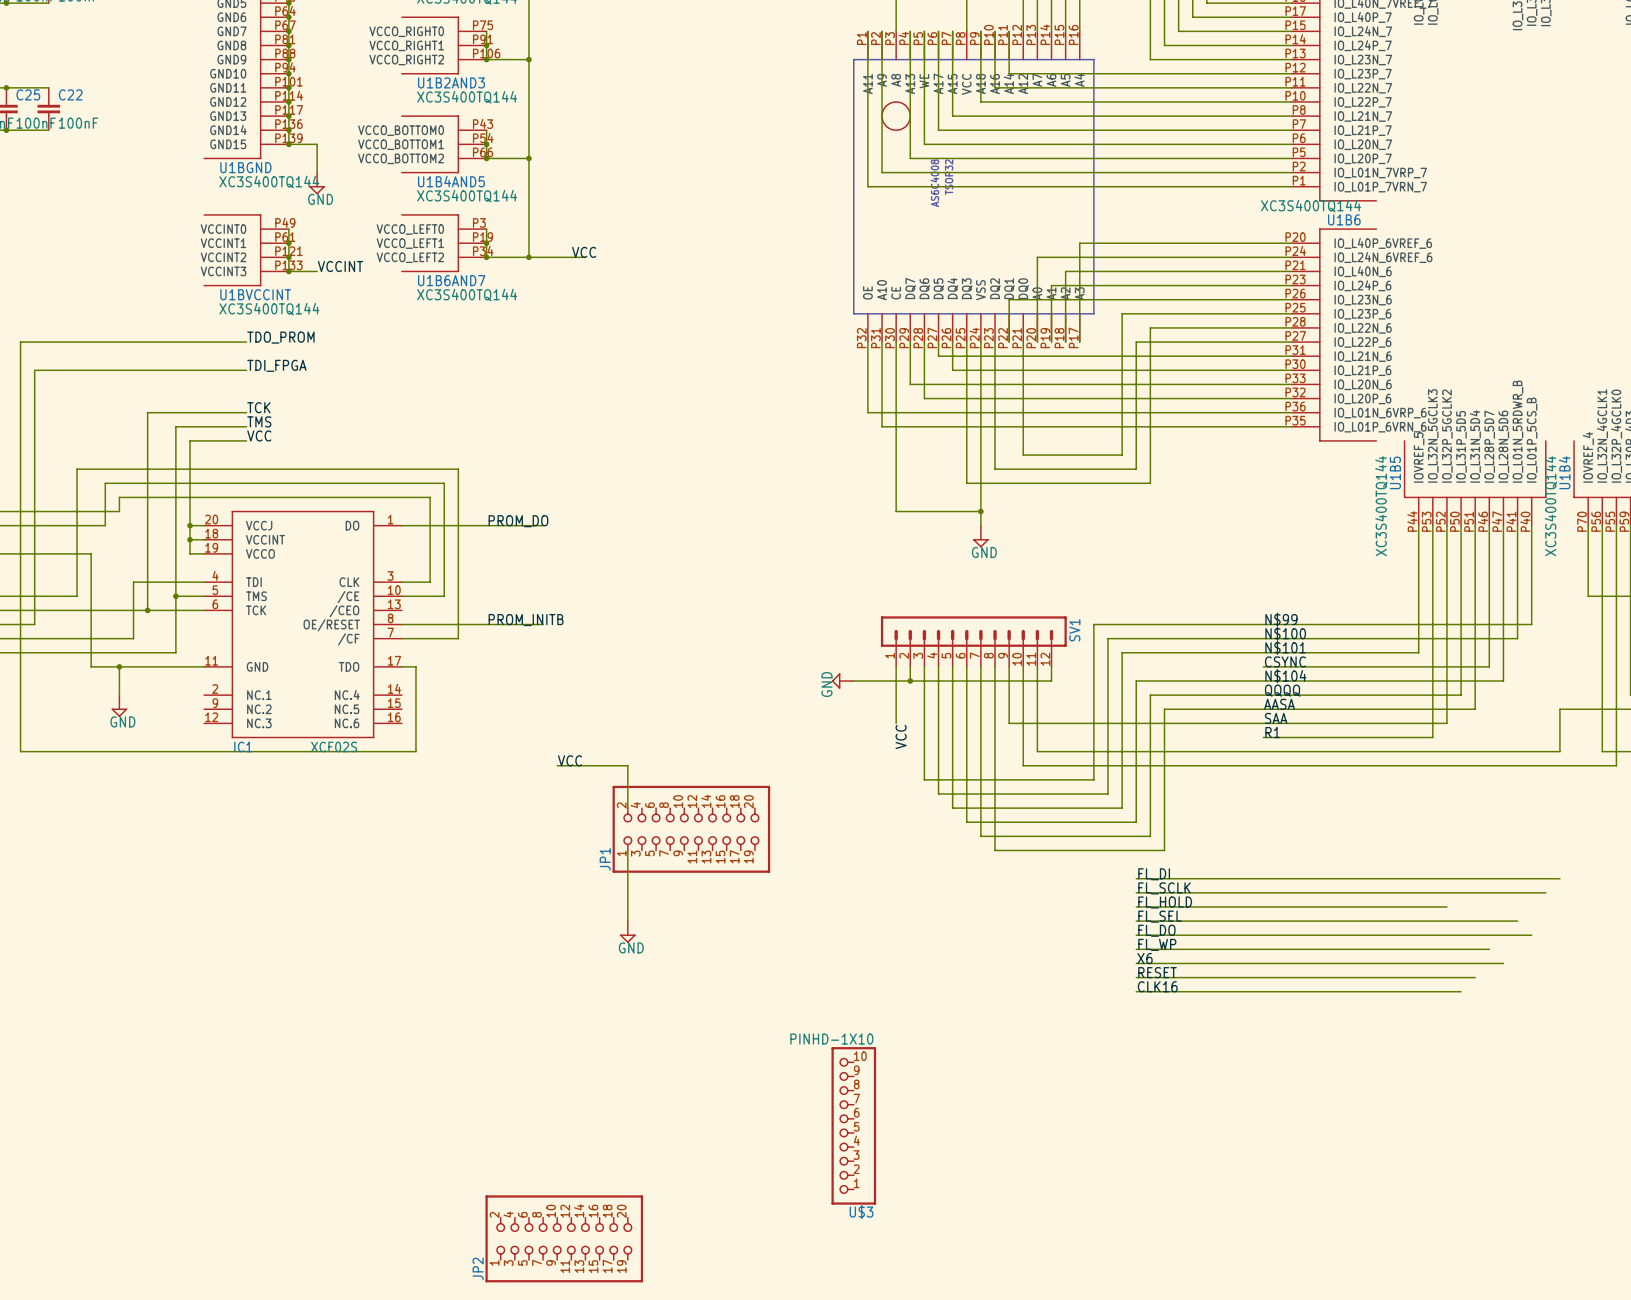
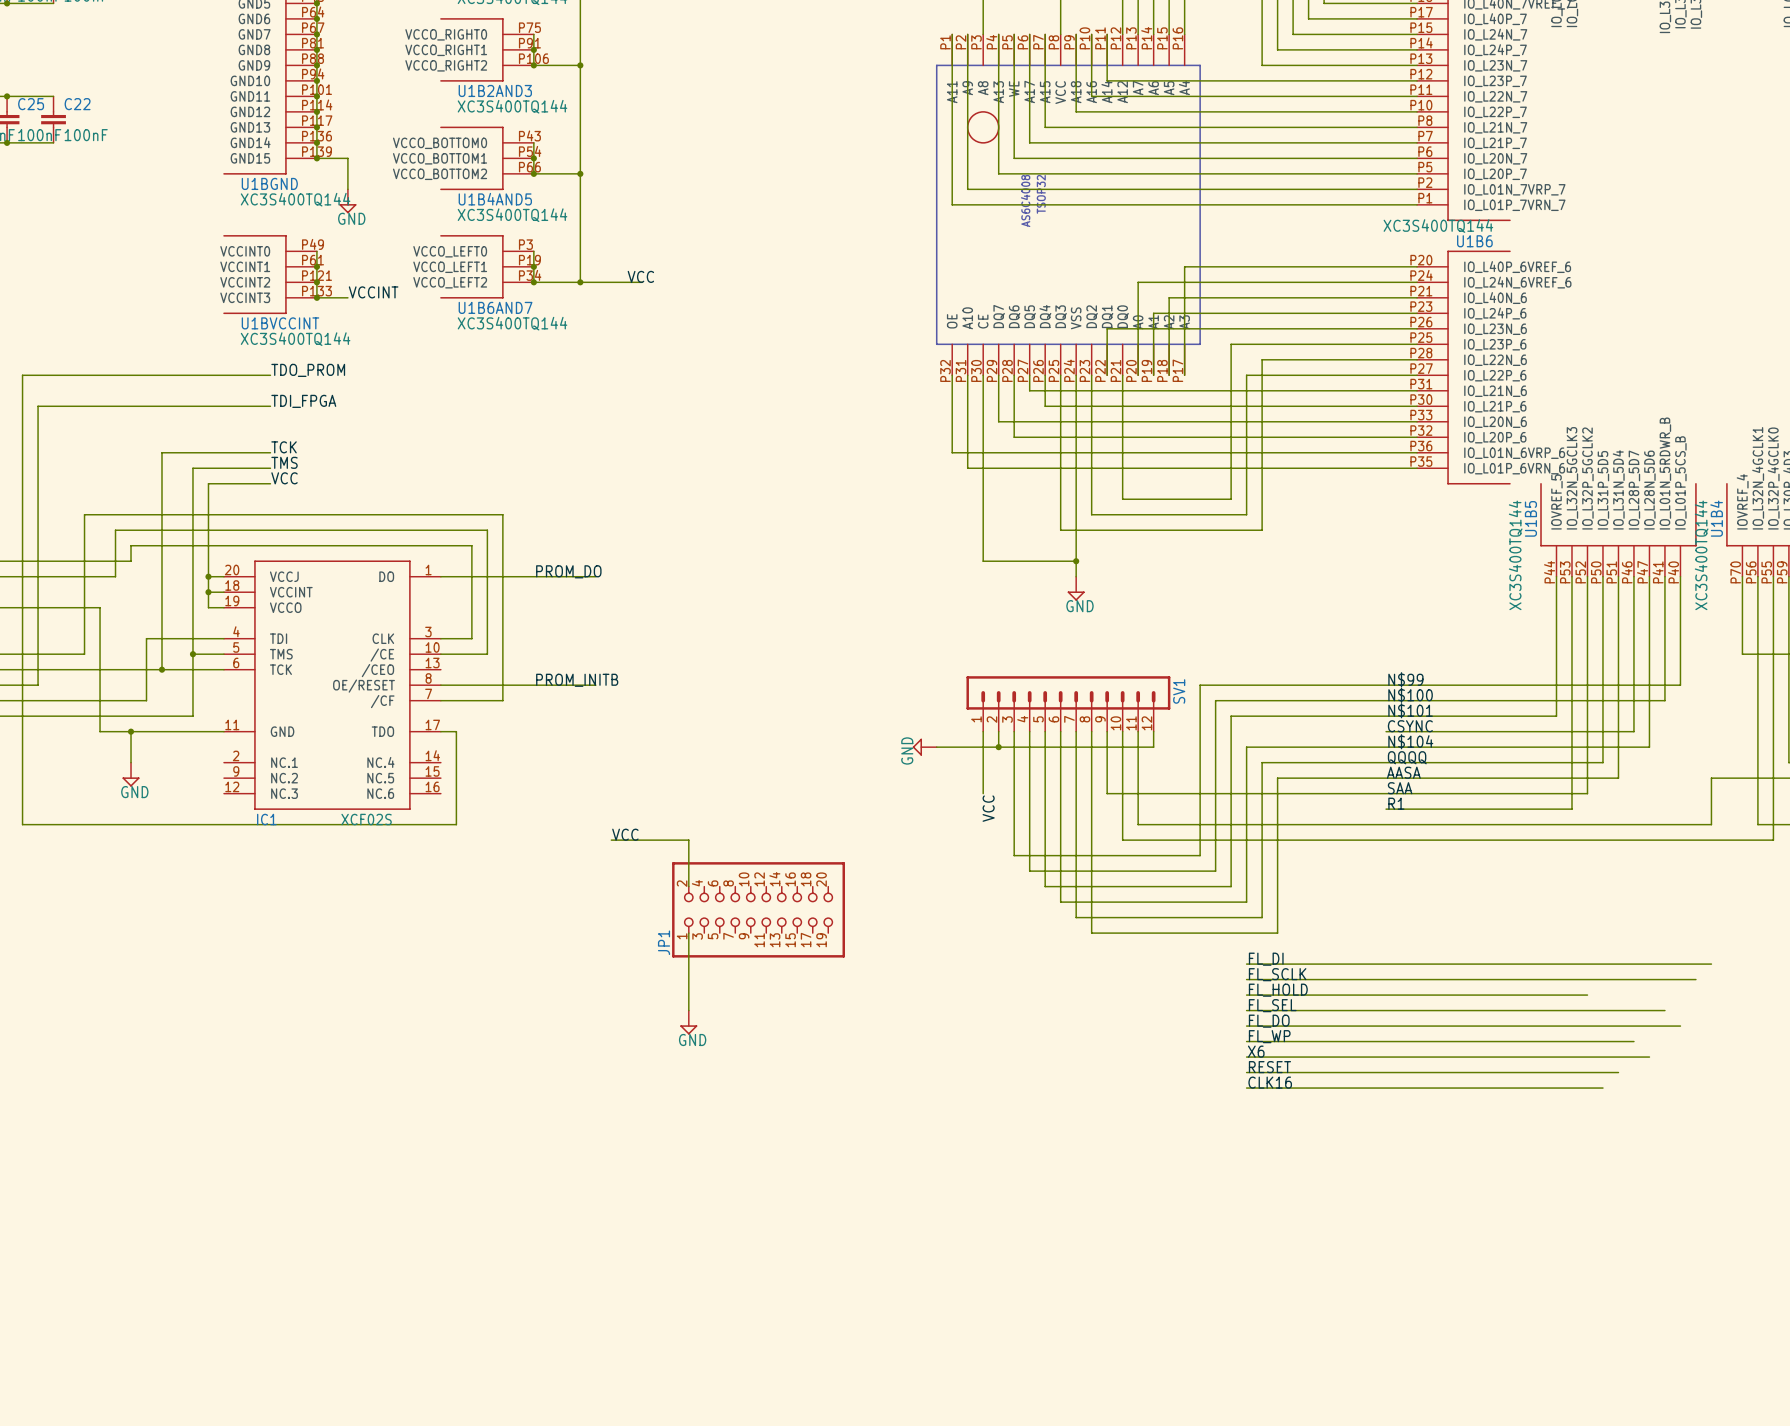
U$3: PINHD-1X10 (853, 1125) -> none
JP2: (564, 1238) -> none

